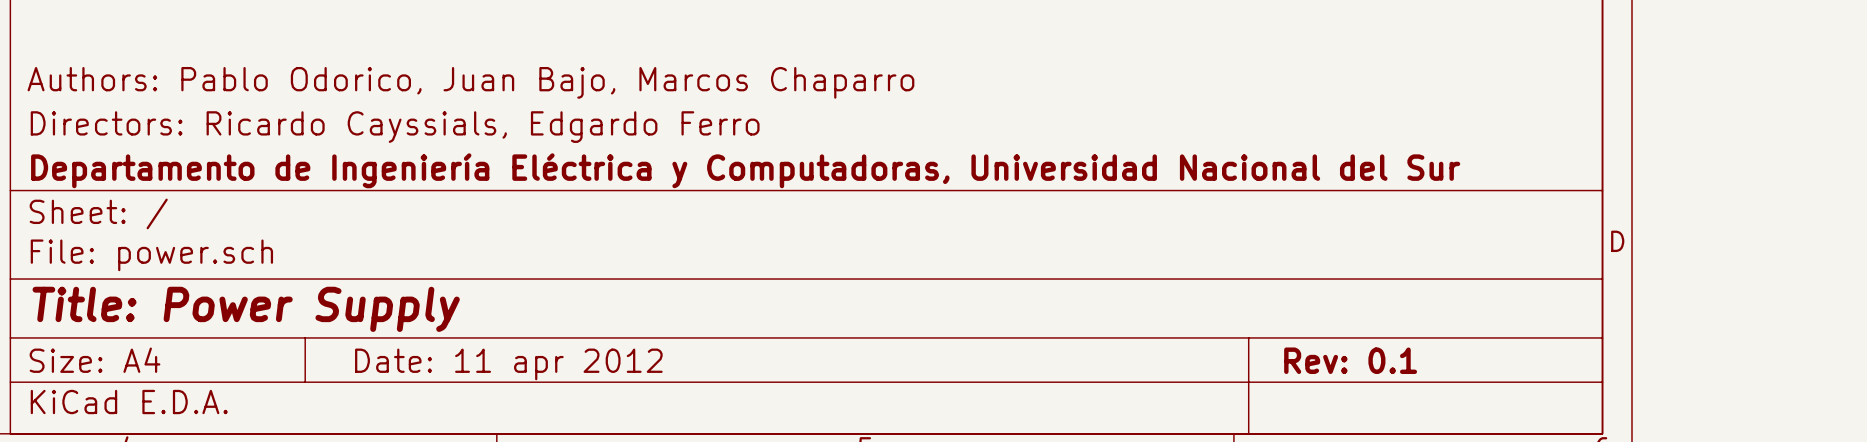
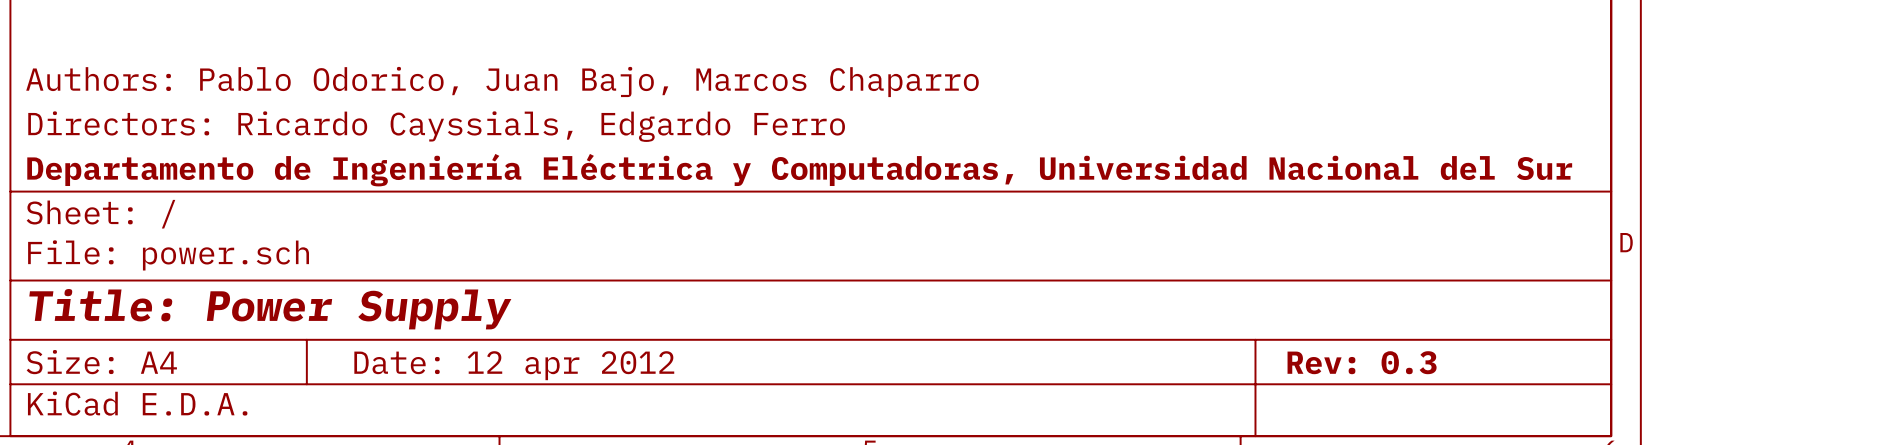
title block: Rev: 0.1 (1350, 360) -> Rev: 0.3 (1362, 362)
title block: Date: 11 apr 2012 (508, 364) -> Date: 12 apr 2012 (514, 365)

